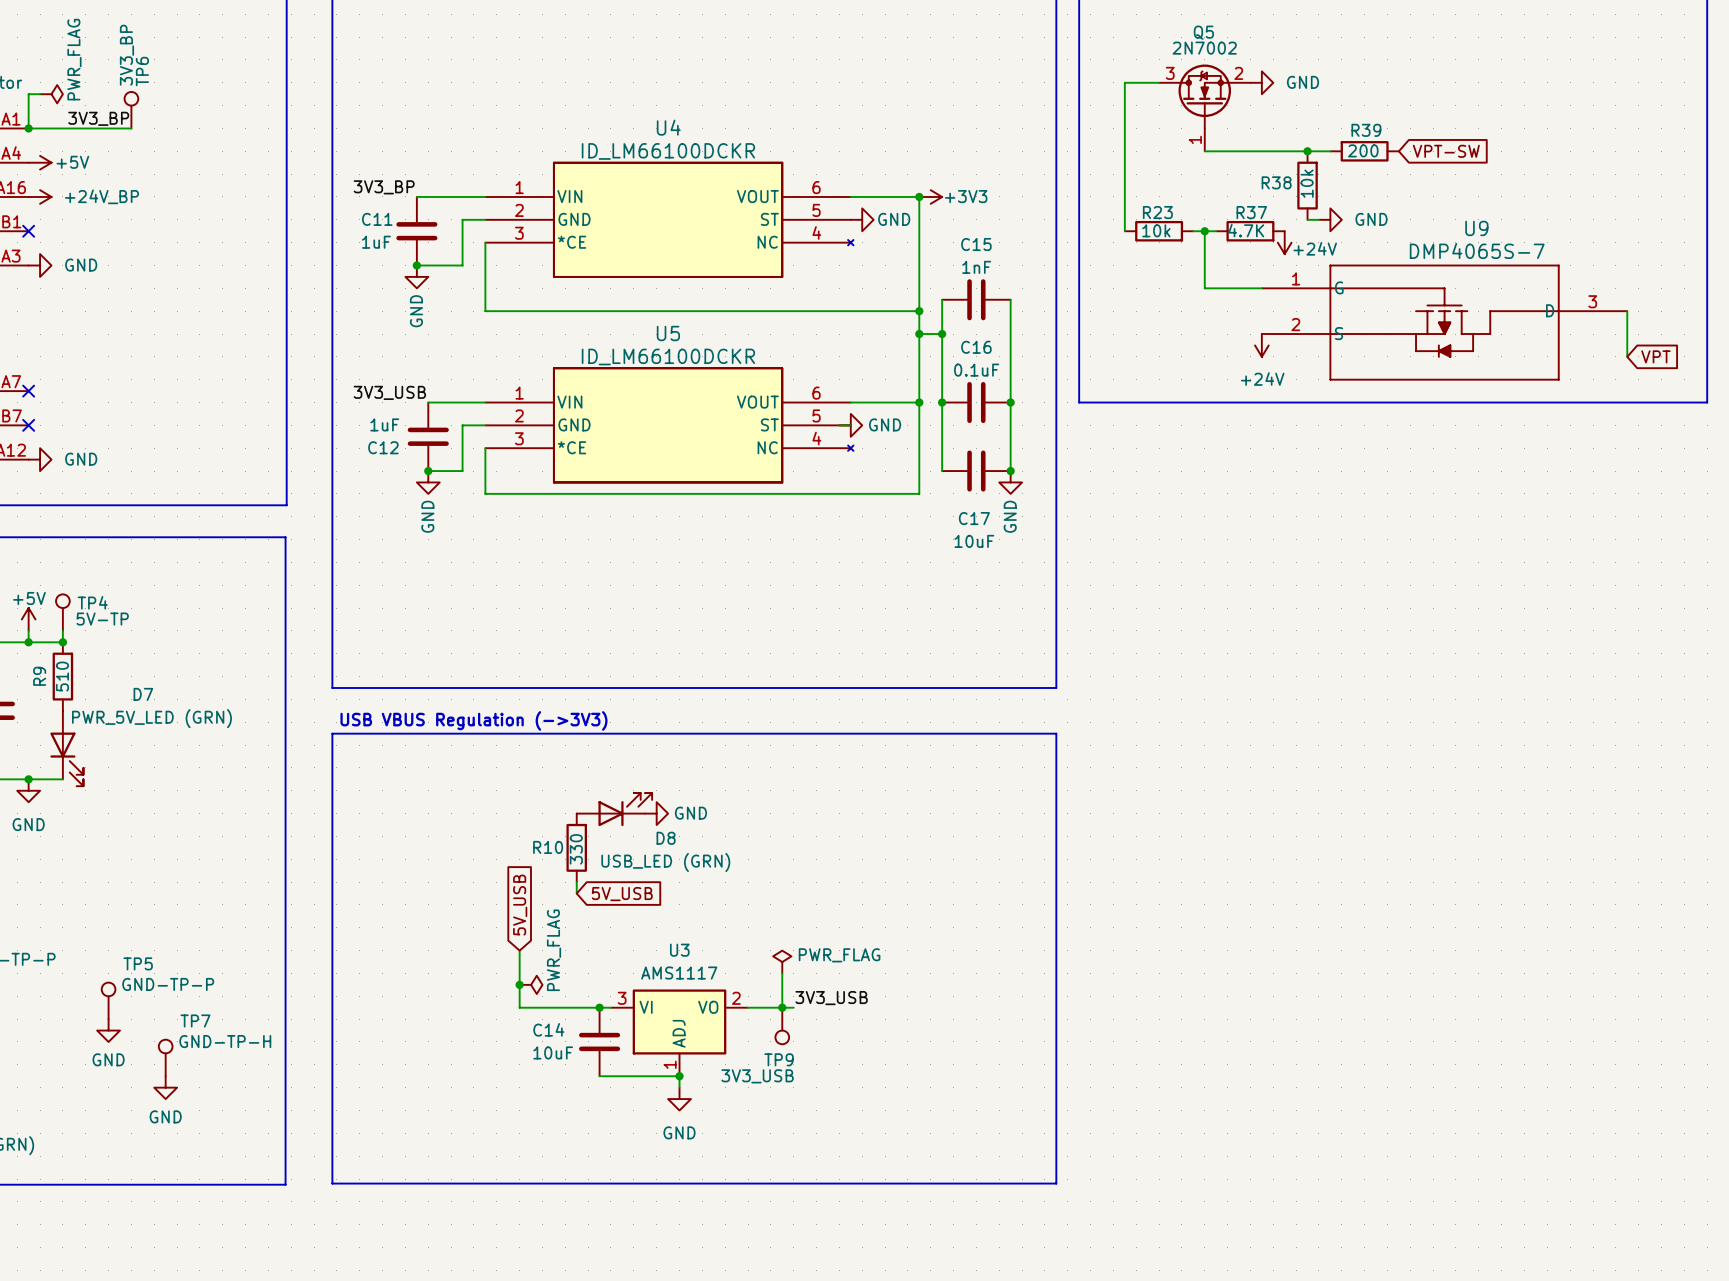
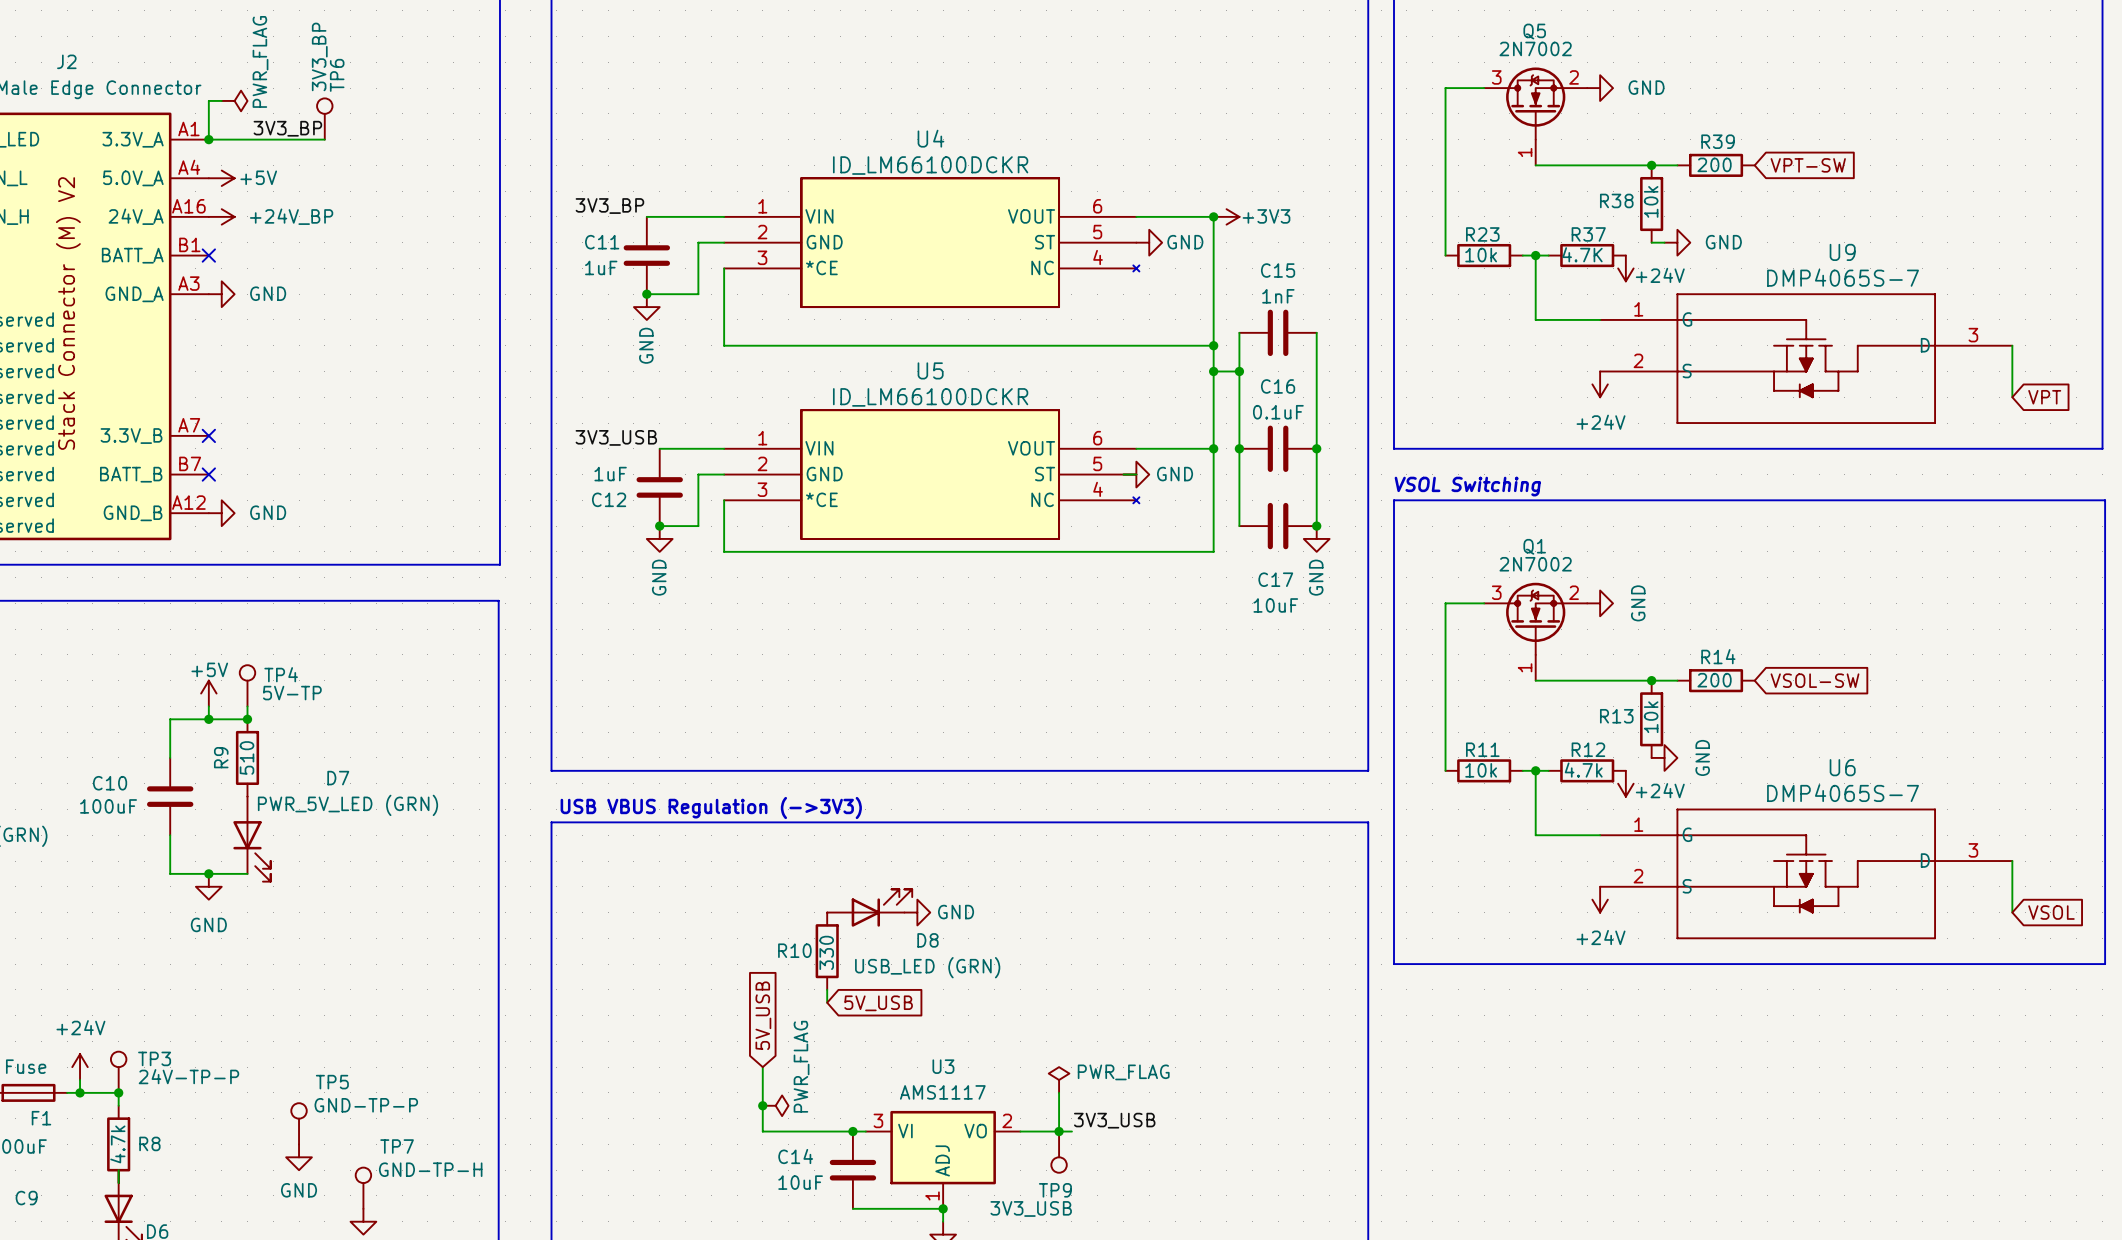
text: none -> VSOL Switching (1467, 486)
line: none -> (1394, 500) (2105, 500) (2105, 964) (1394, 964) (1394, 500)
wire: none -> (1484, 603) (1445, 603) (1445, 770)
power symbol: none -> GND (1600, 603)
Q1: none -> 2N7002 (1535, 631)
wire: none -> (1535, 680) (1677, 680)
junction: none -> (1651, 680)
R14: none -> 200 (1716, 680)
global label: none -> VSOL-SW (1814, 680)
R13: none -> 10k (1651, 719)
power symbol: none -> GND (1664, 757)
R11: none -> 10k (1484, 770)
wire: none -> (1522, 770) (1548, 770)
wire: none -> (1535, 770) (1535, 835) (1600, 835)
junction: none -> (1535, 770)
R12: none -> 4.7k (1587, 770)
power symbol: none -> +24V (1625, 783)
wire: none -> (2012, 861) (2012, 912)
U6: none -> DMP4065S-7 (1806, 873)
power symbol: none -> +24V (1600, 899)
global label: none -> VSOL (2051, 912)

